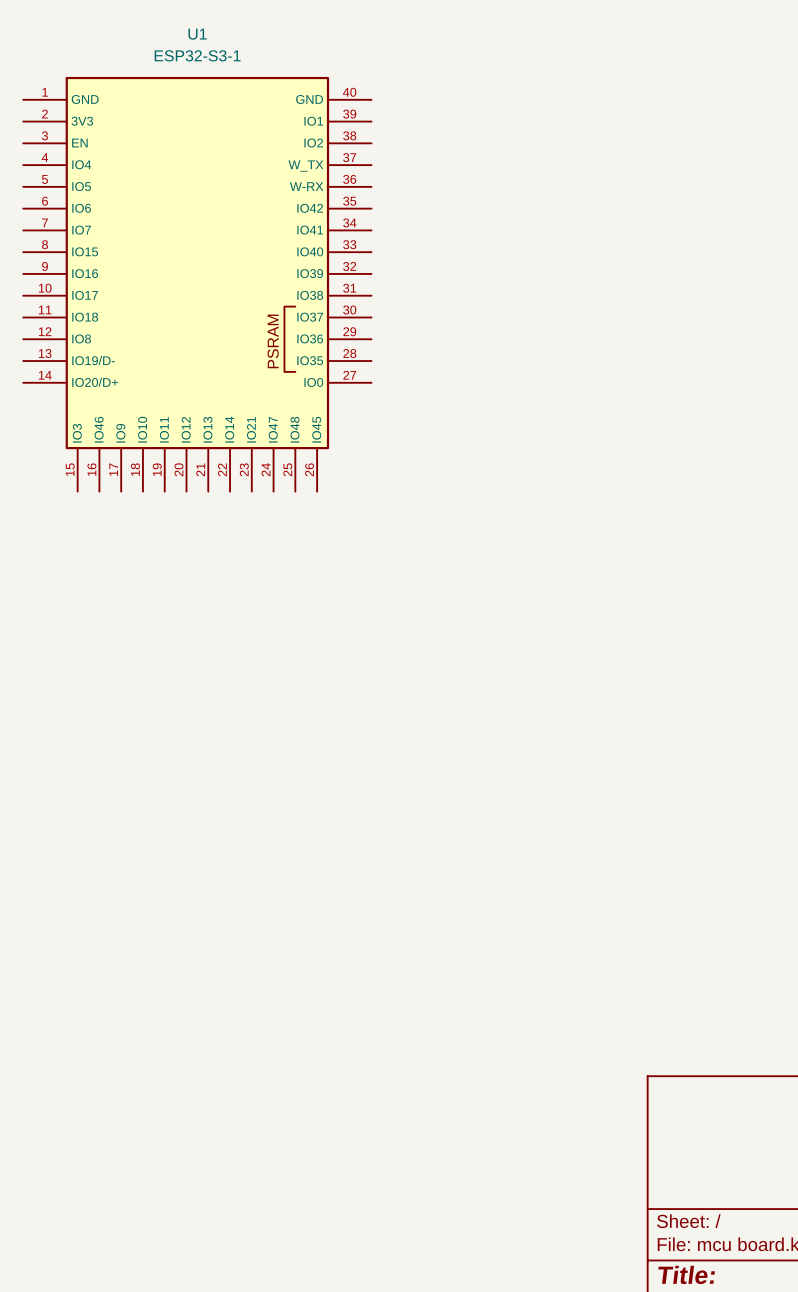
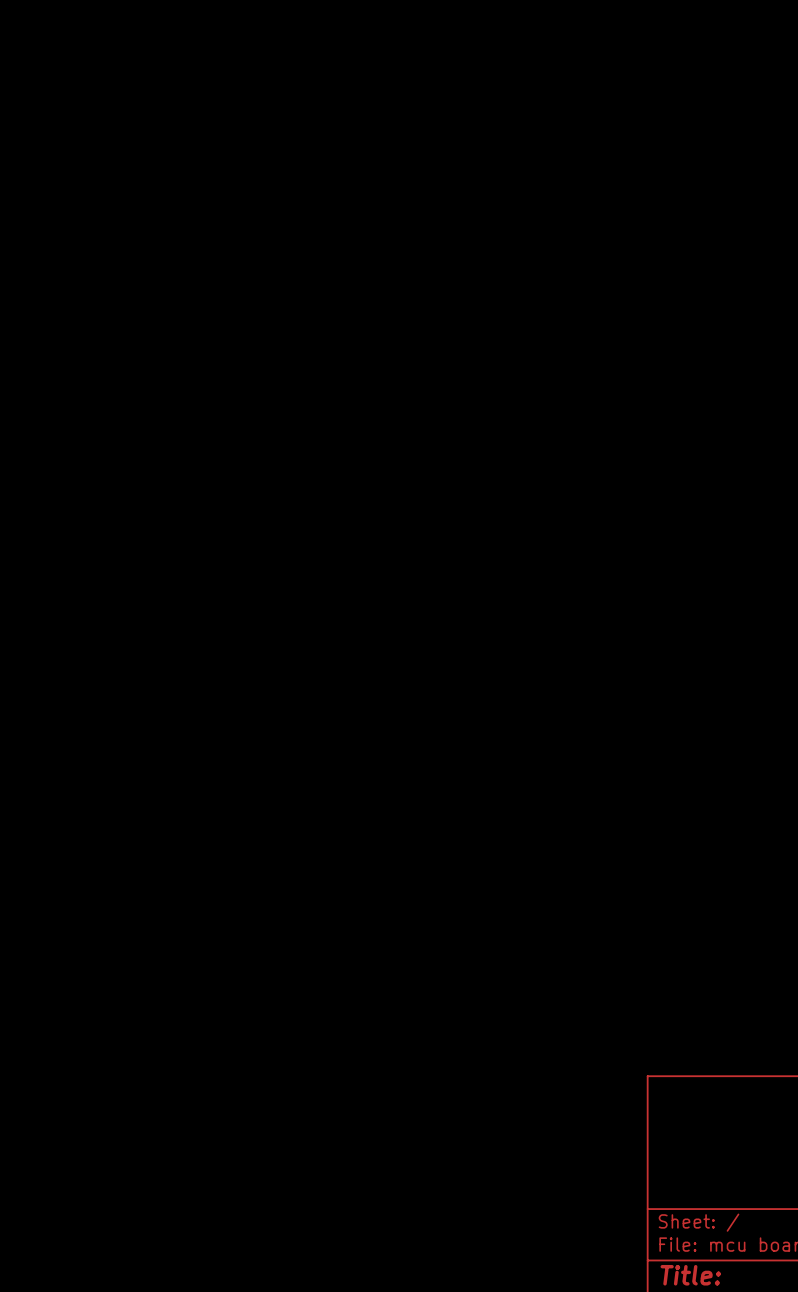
U1: ESP32-S3-1 (197, 284) -> none

